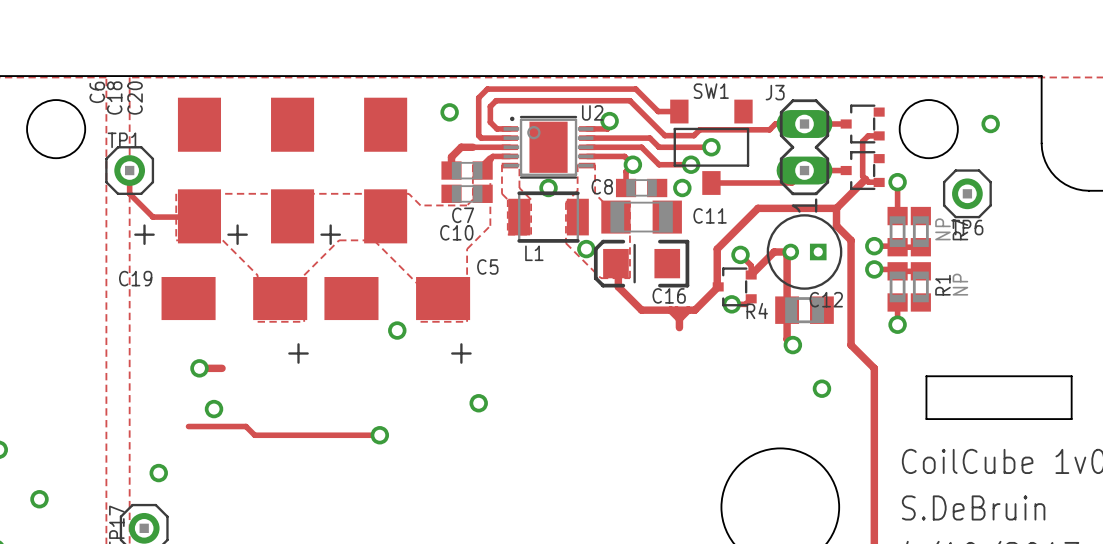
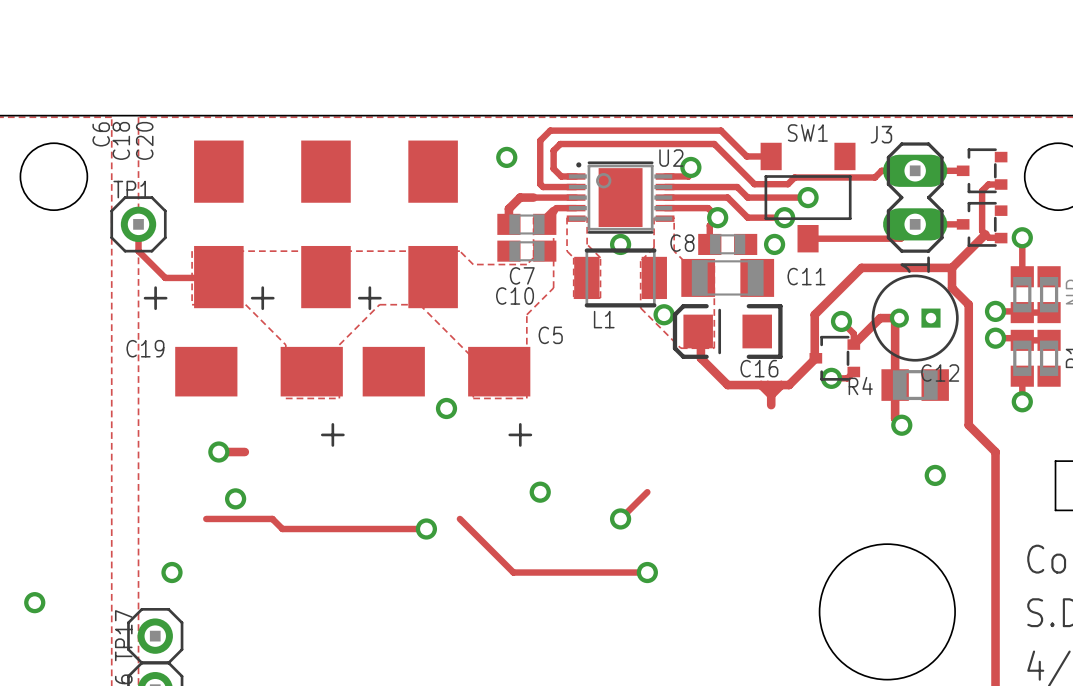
track: none -> (647, 492) (620, 518)
track: none -> (459, 518) (513, 572) (647, 572)
via: none -> (620, 518)
via: none -> (647, 572)

